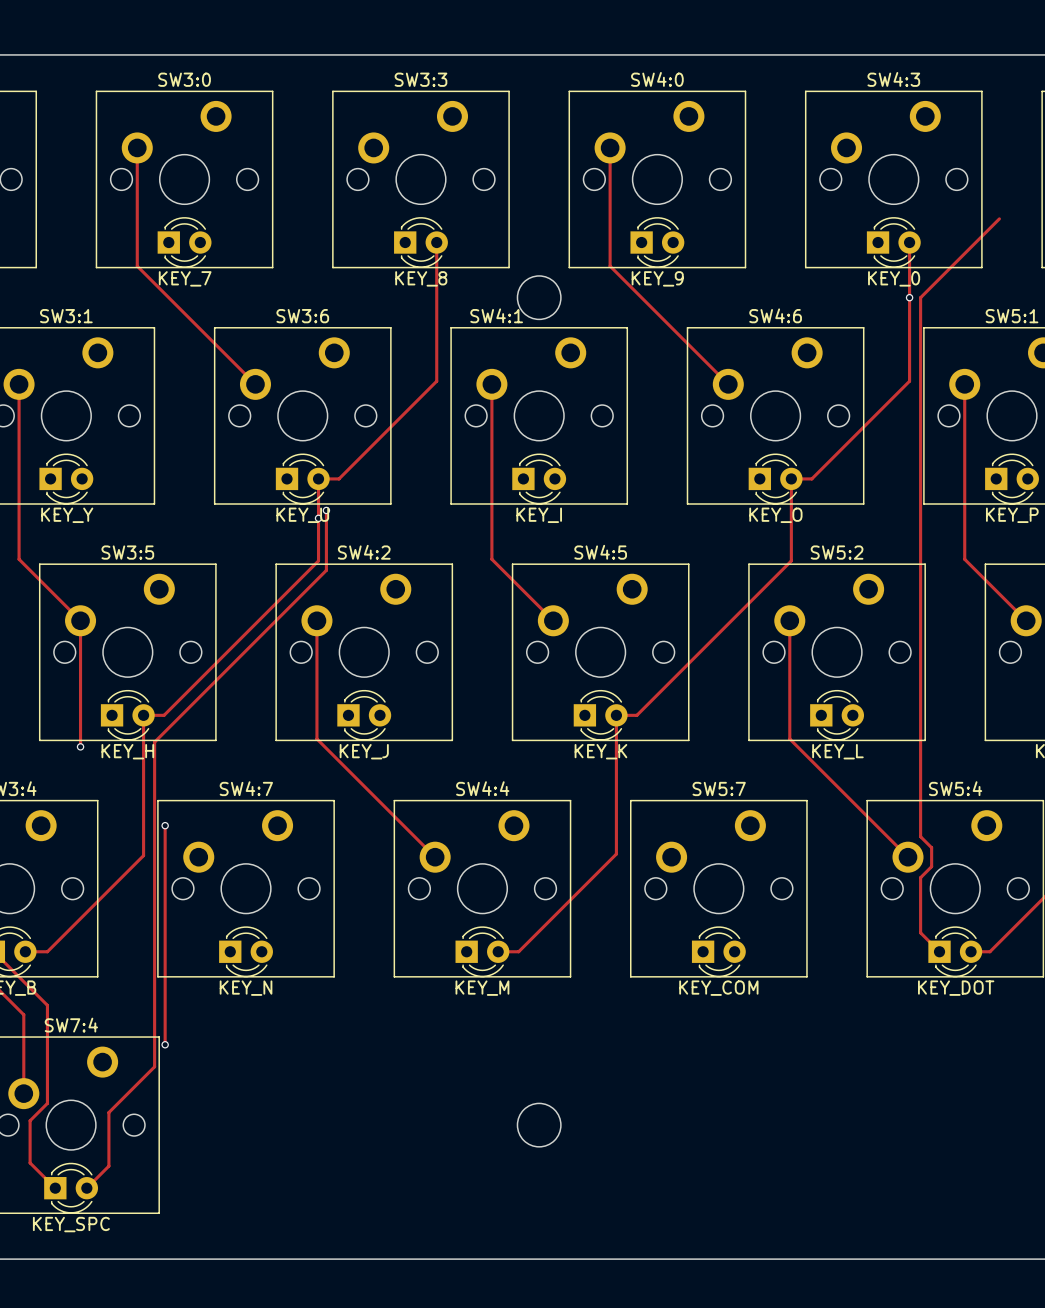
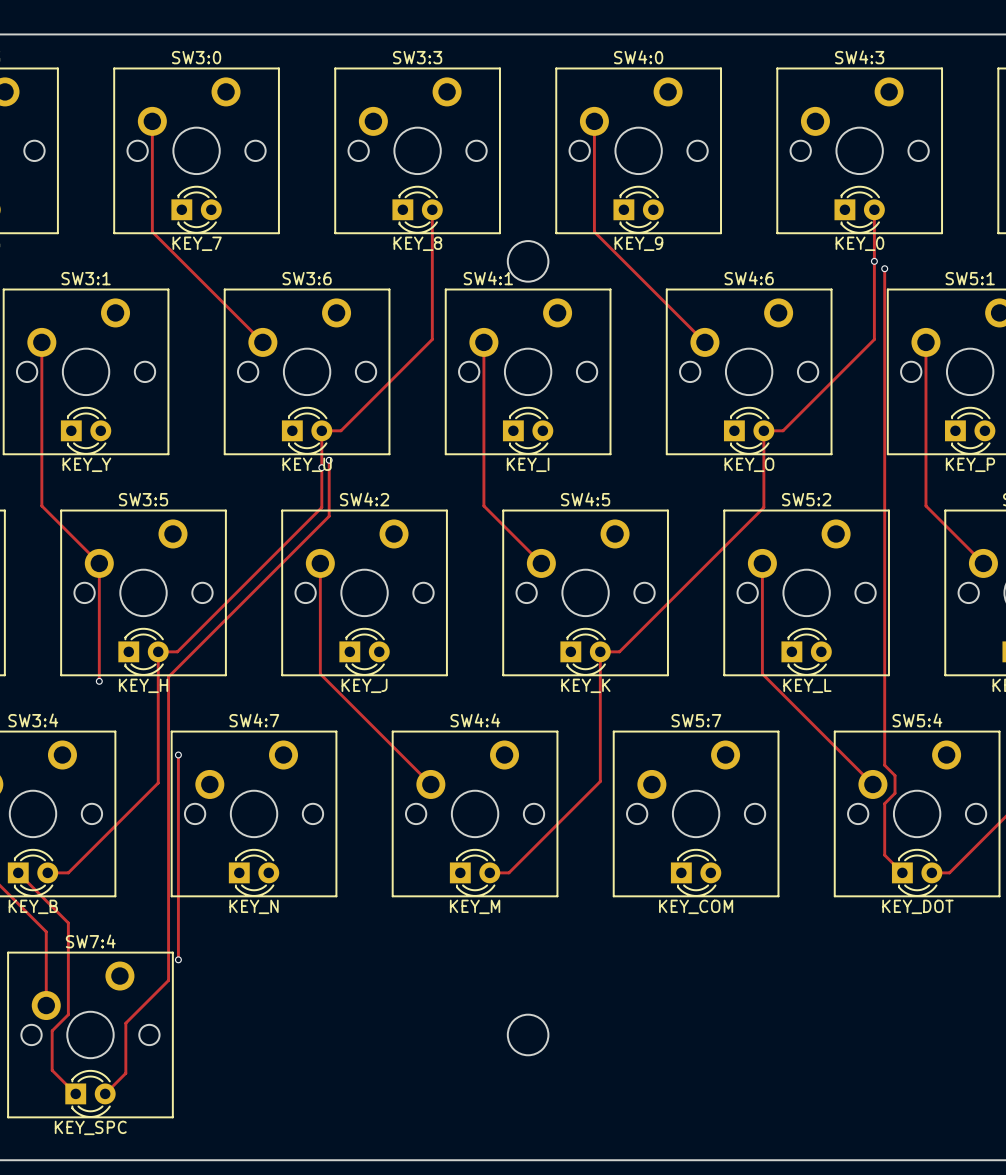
track: (999, 218) (920, 297) (920, 305) -> none
via: none -> (884, 268)

